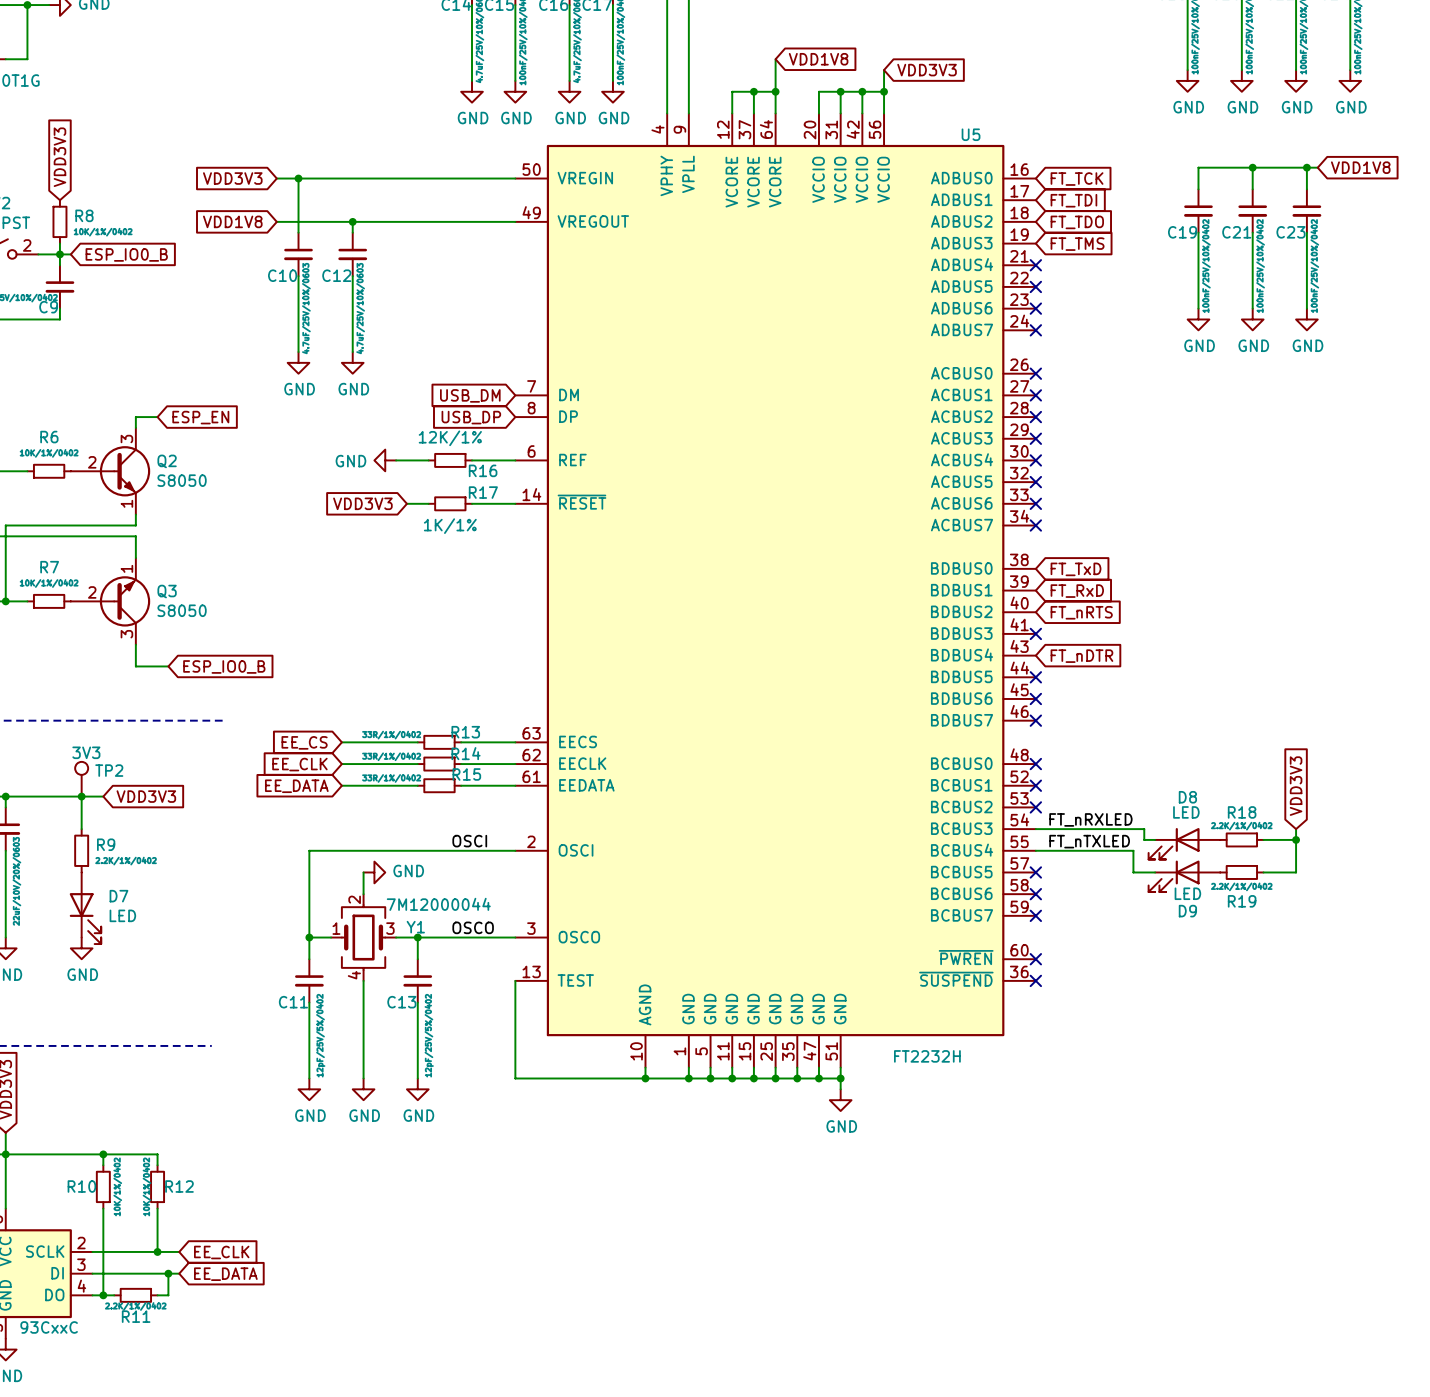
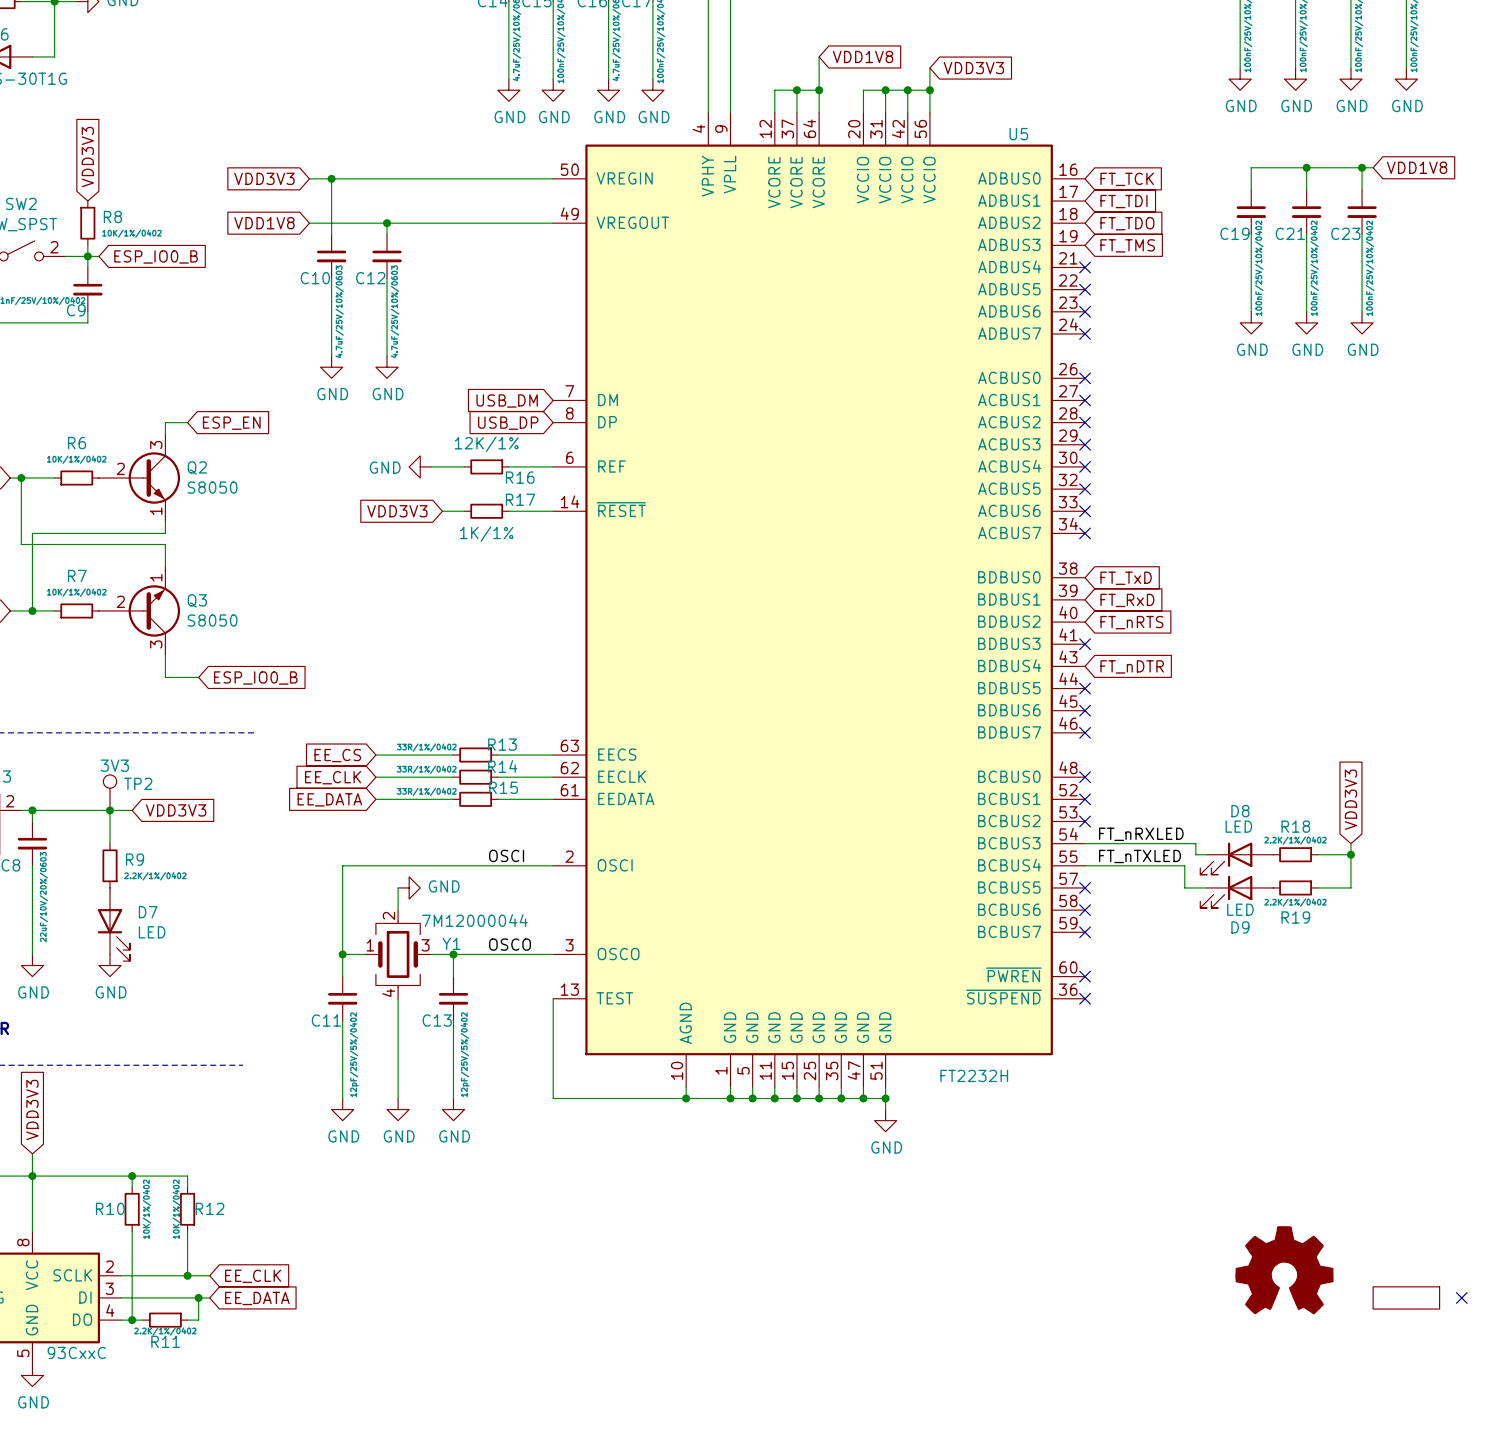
power symbol: none -> (1284, 1270)
part: none -> (1406, 1297)
no-connect mark: none -> (1461, 1297)

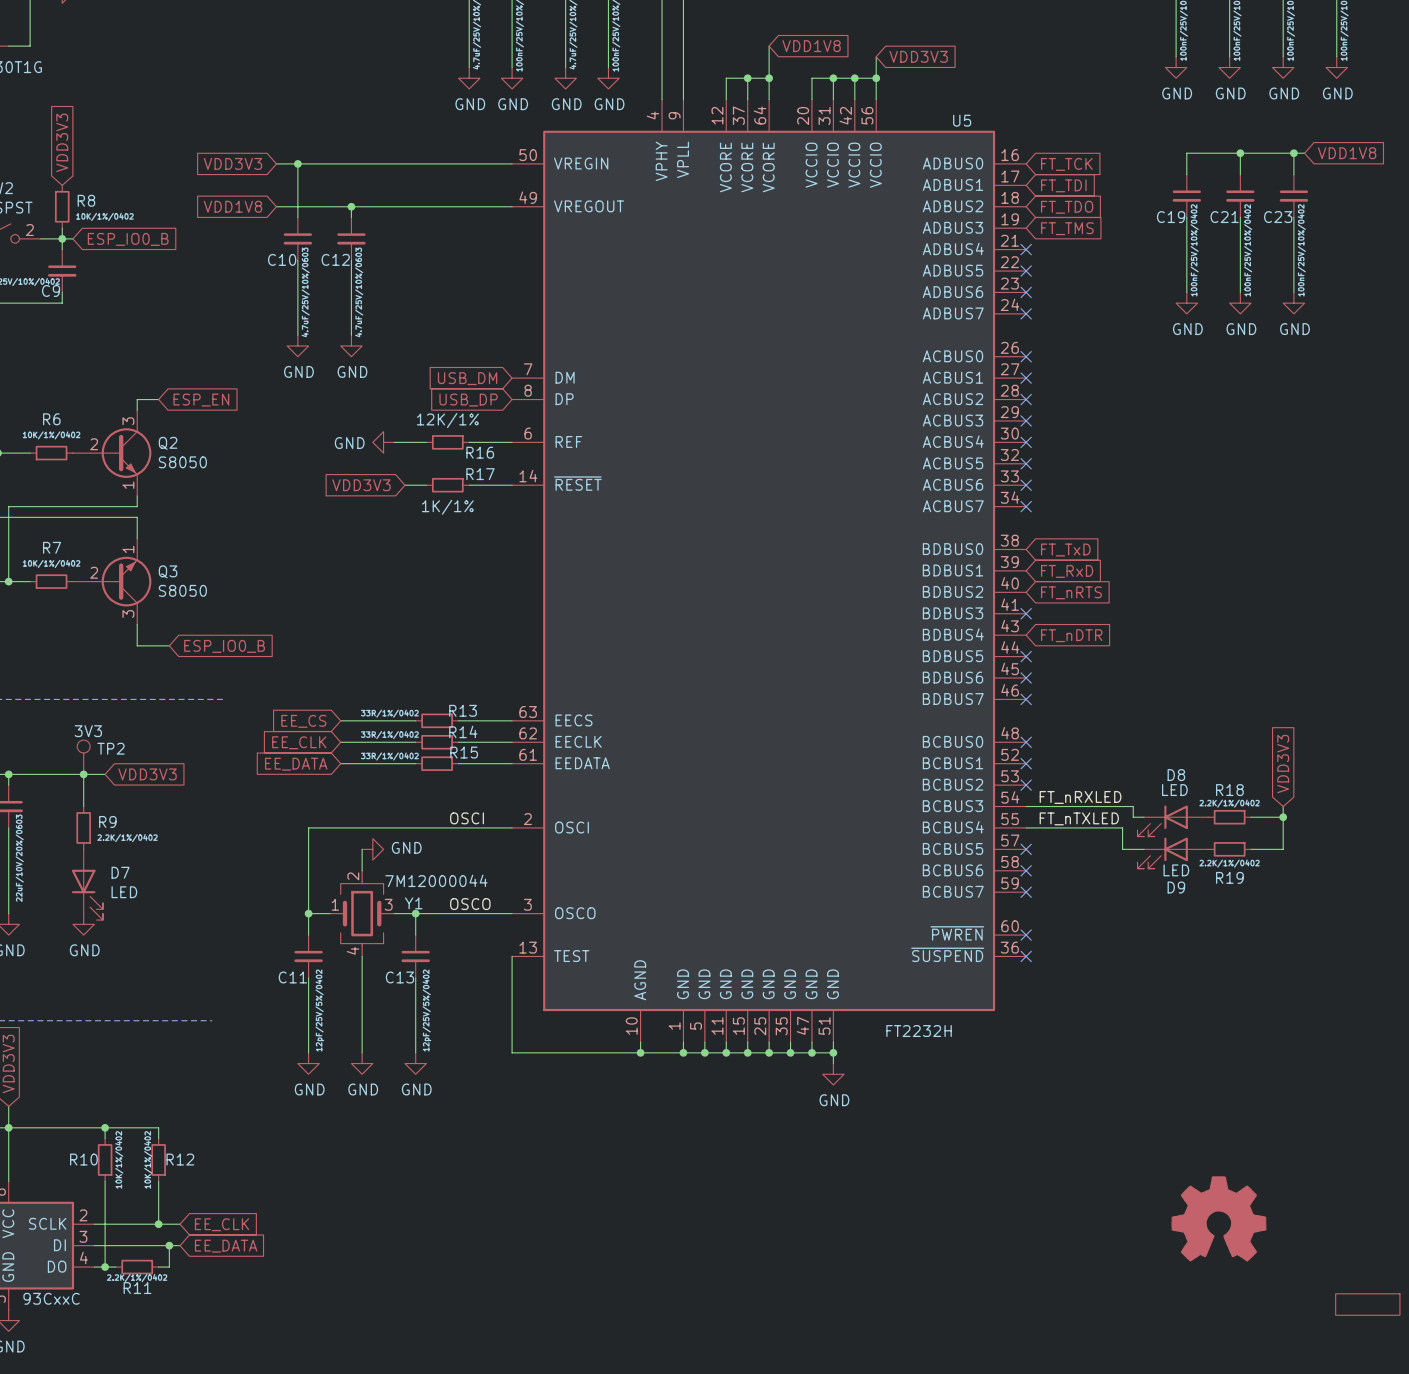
part position: (1406, 1297) -> (1367, 1304)
no-connect mark: (1461, 1297) -> none

